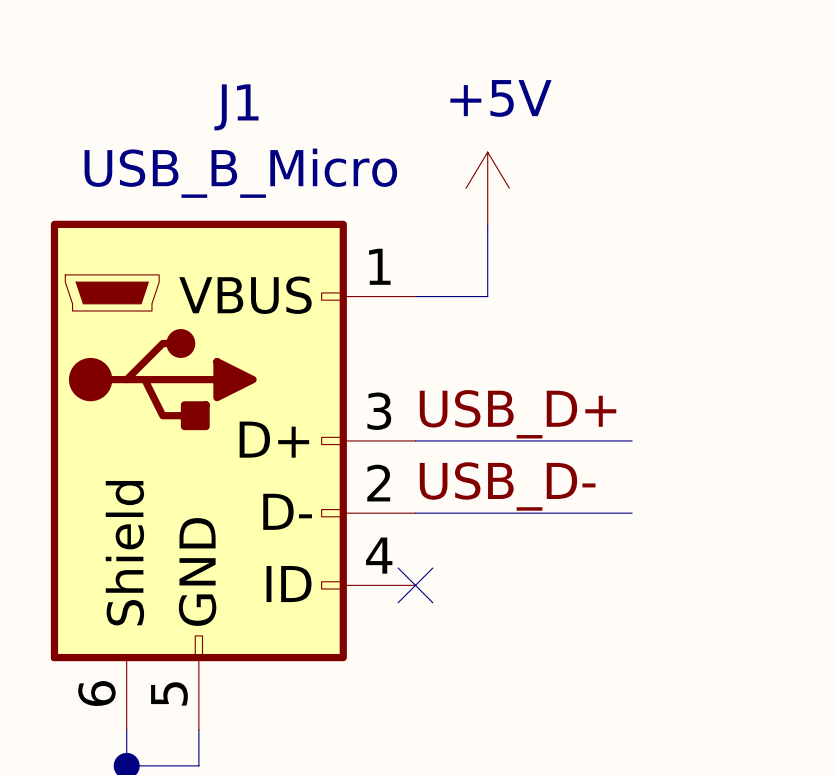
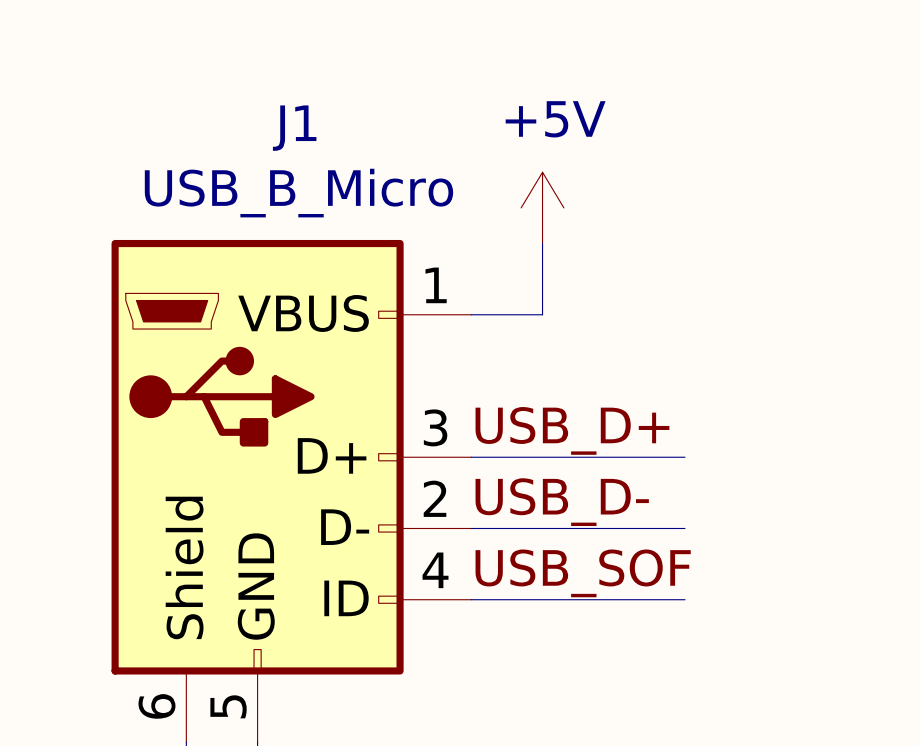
label: none -> USB_SOF (583, 573)
wire: none -> (471, 599) (685, 599)
no-connect mark: (415, 585) -> none

